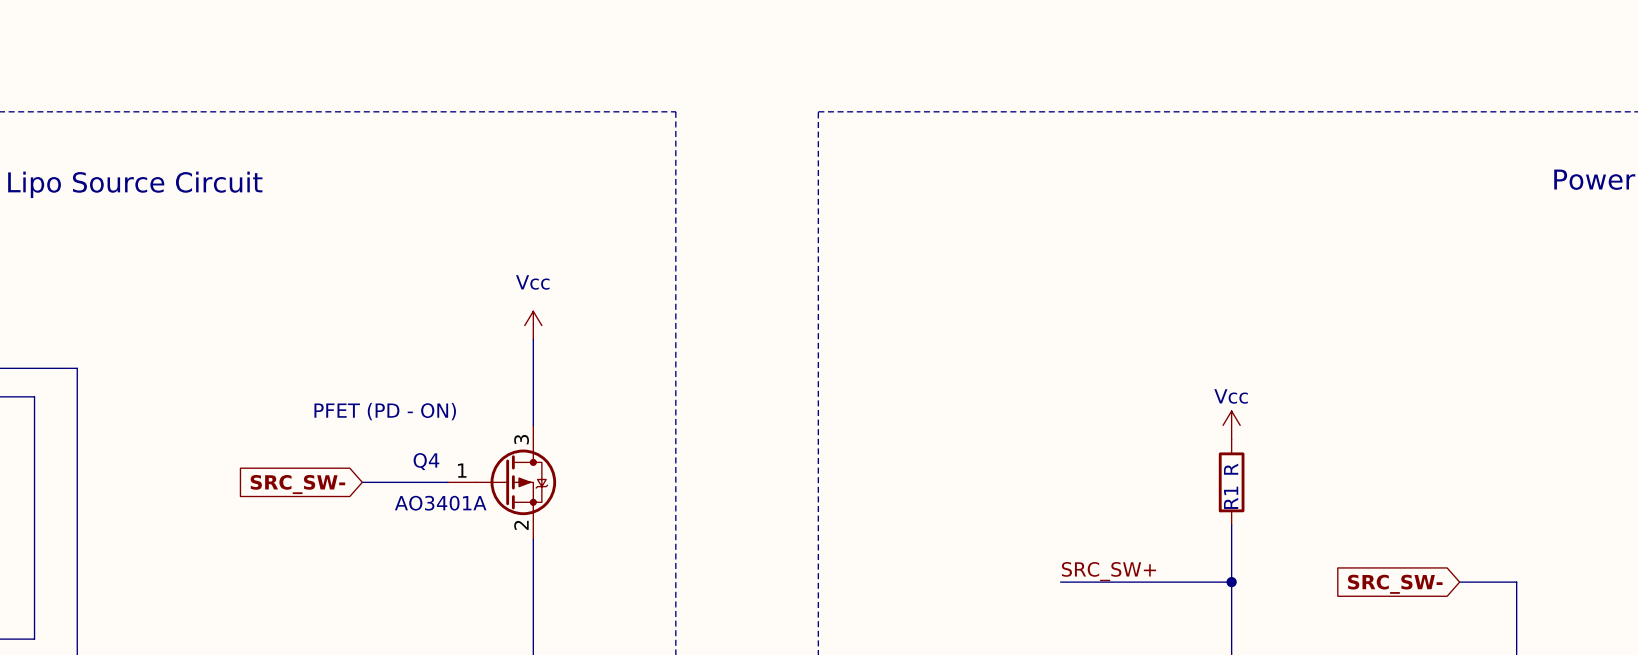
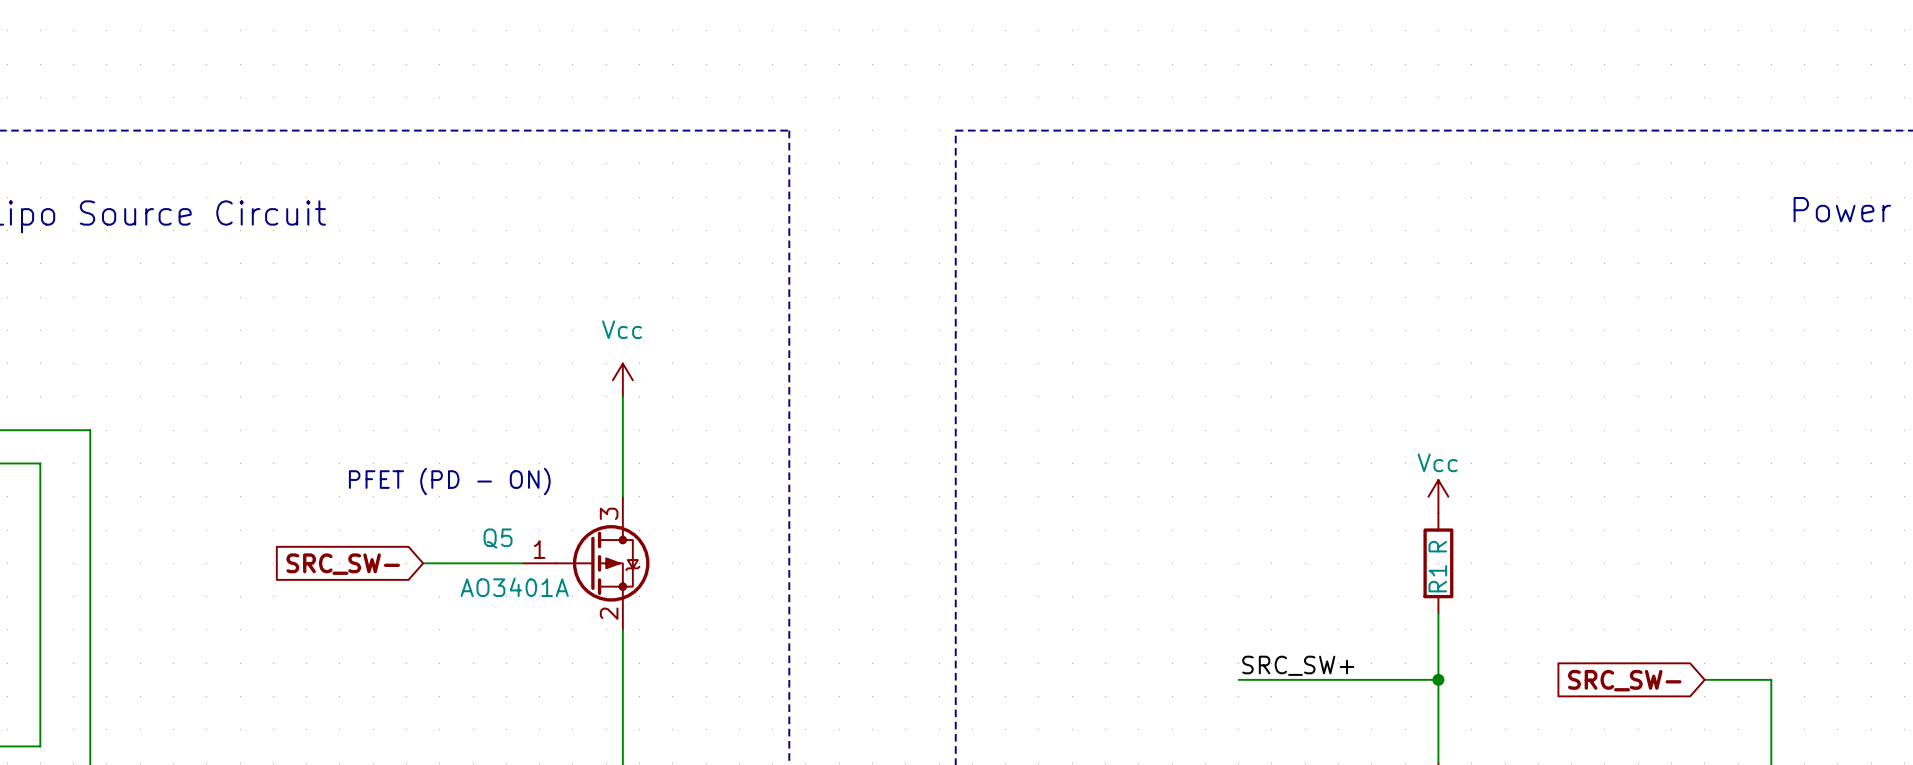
Q4 name: Q4 (426, 461) -> Q5 (498, 538)

